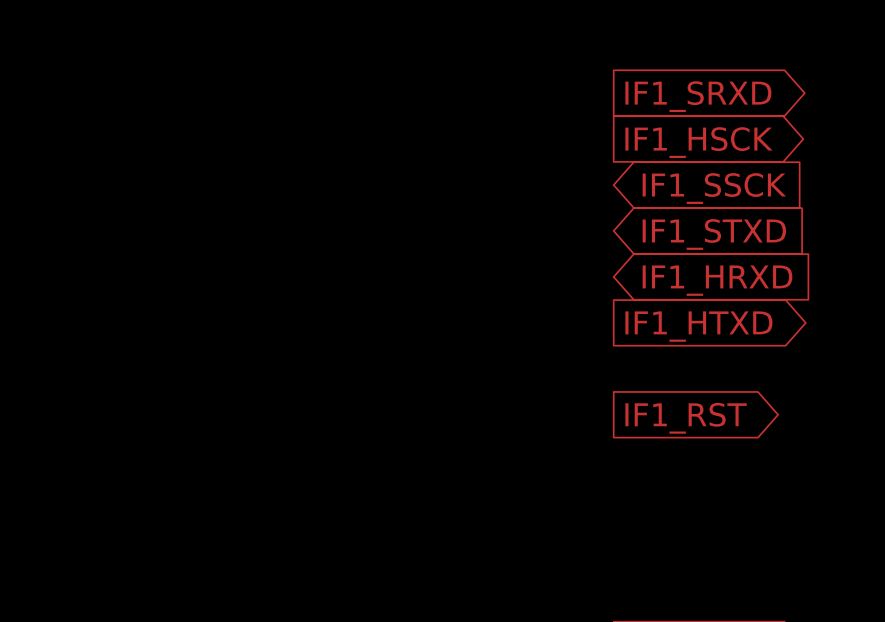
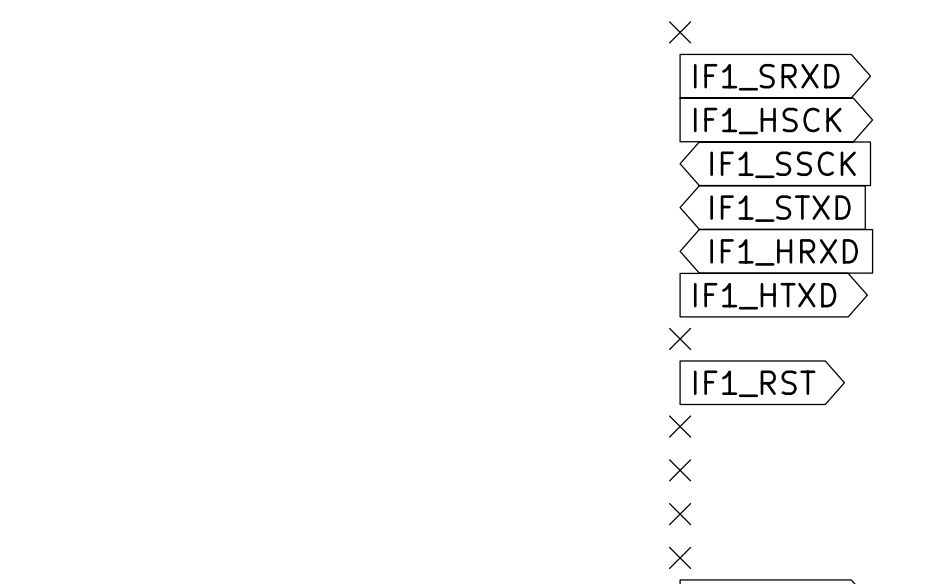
no-connect mark: none -> (680, 32)
no-connect mark: none -> (680, 338)
no-connect mark: none -> (680, 426)
no-connect mark: none -> (680, 470)
no-connect mark: none -> (680, 514)
no-connect mark: none -> (680, 557)

